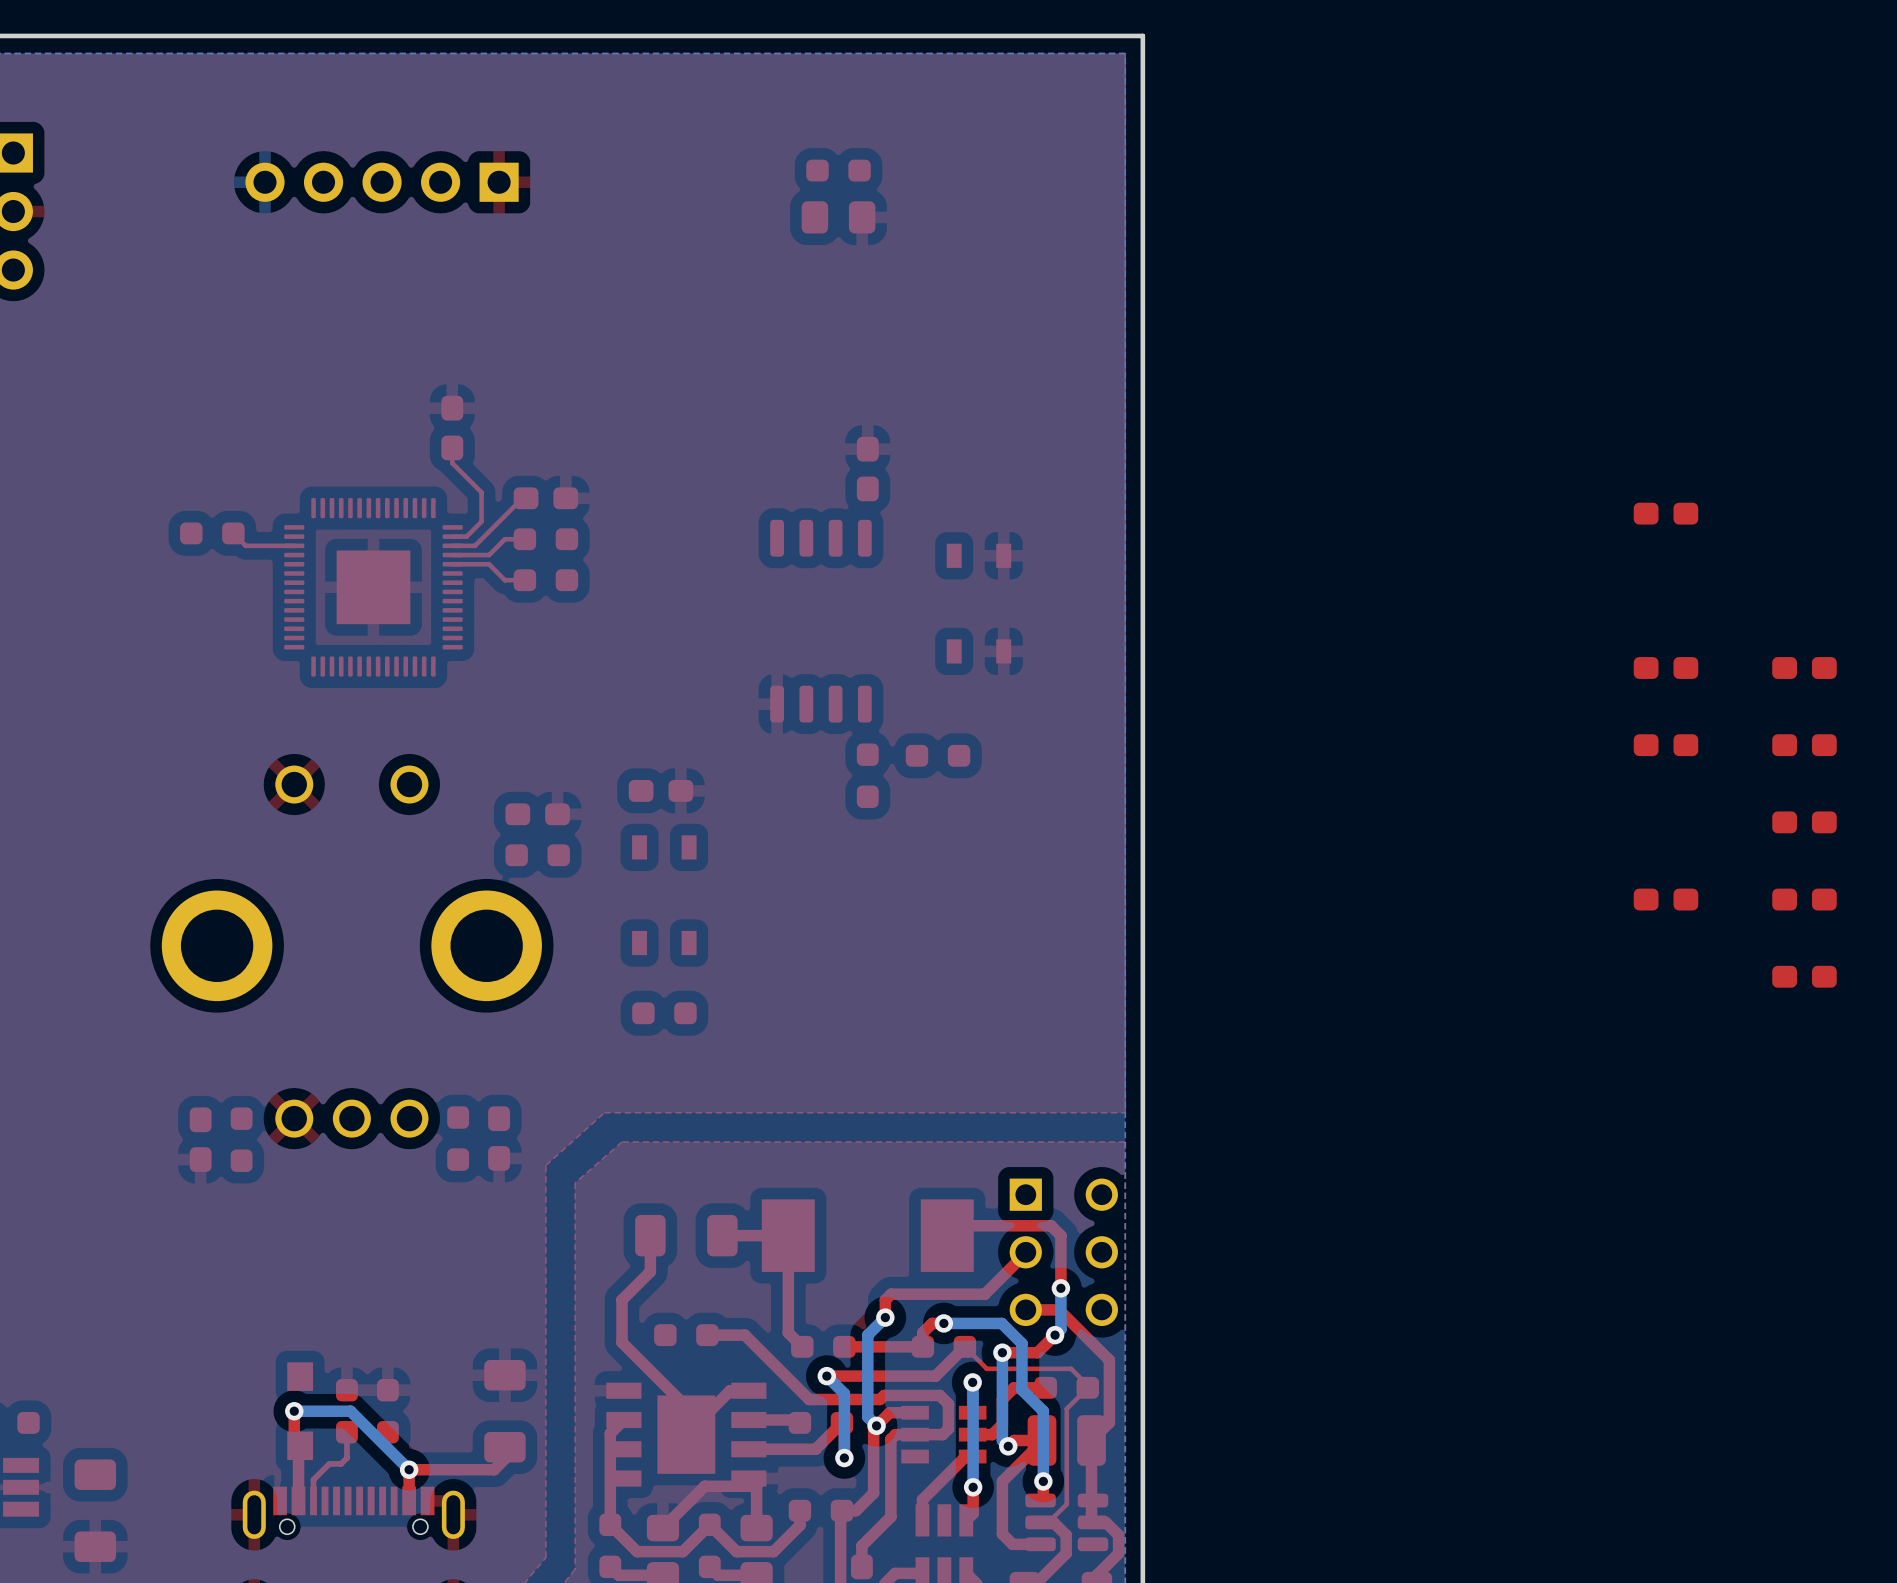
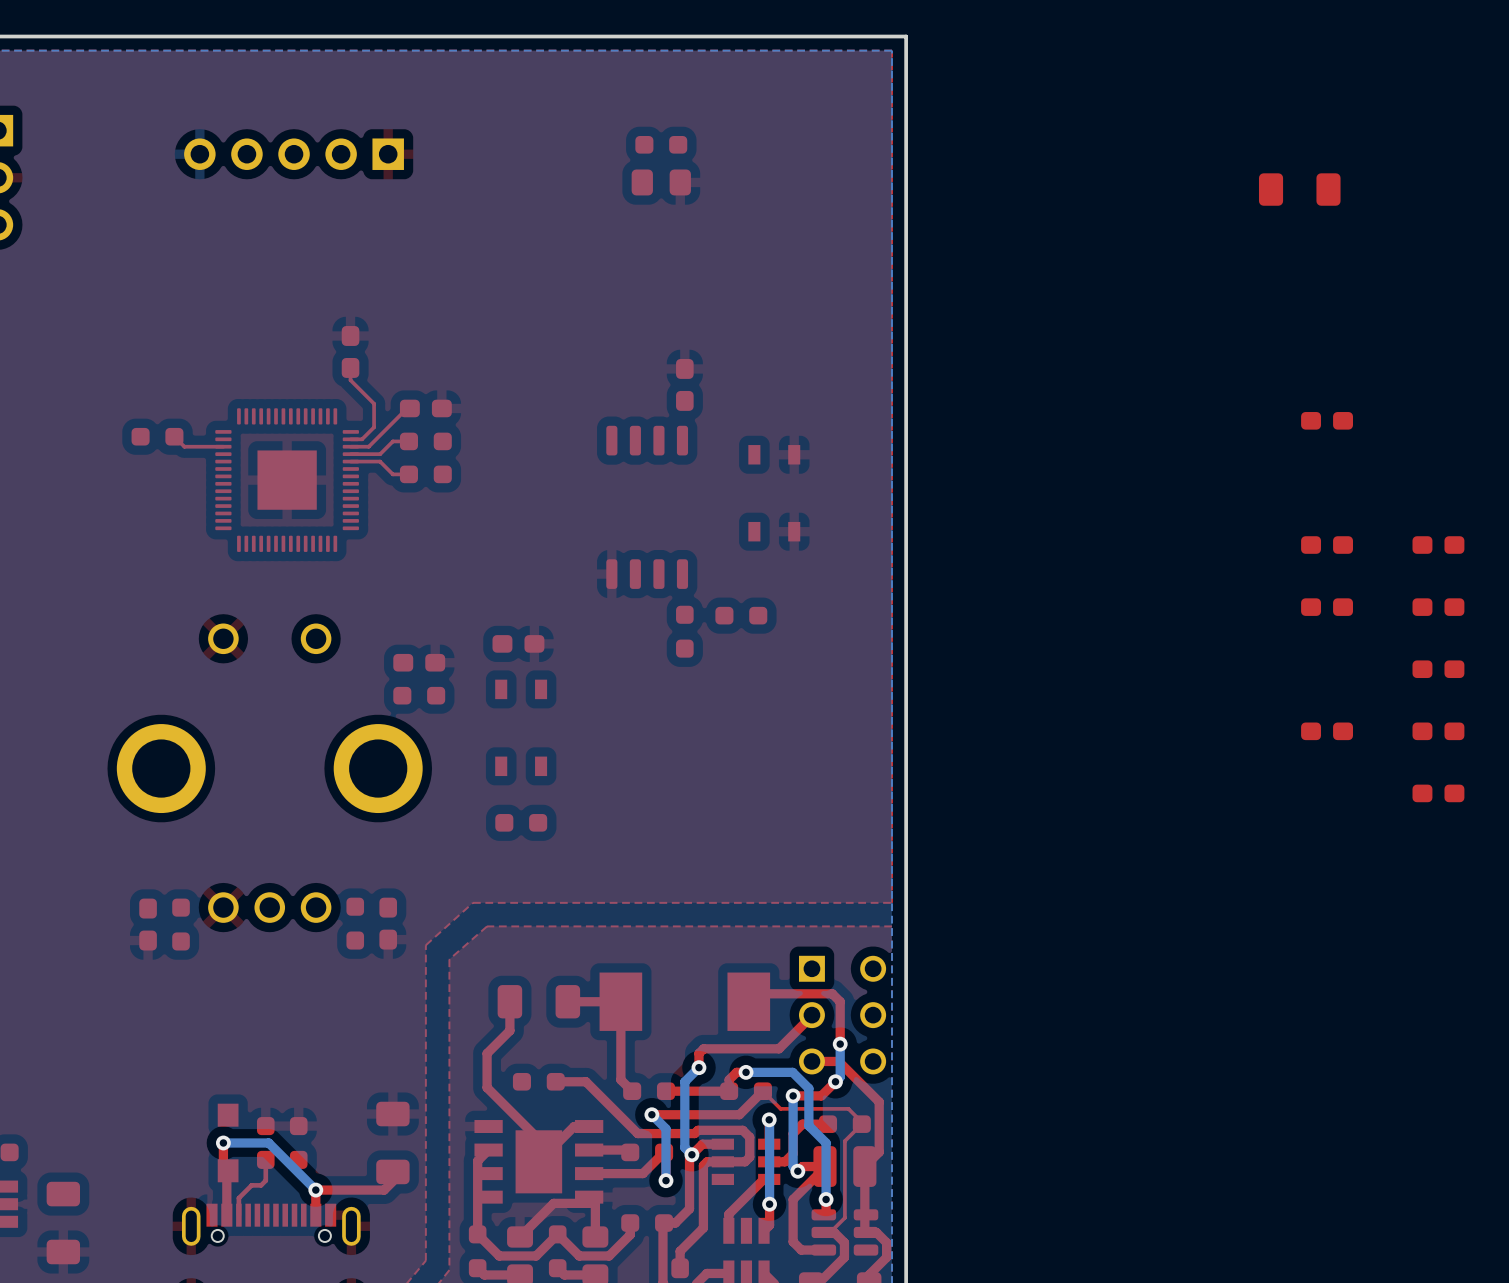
part: none -> (1299, 189)

